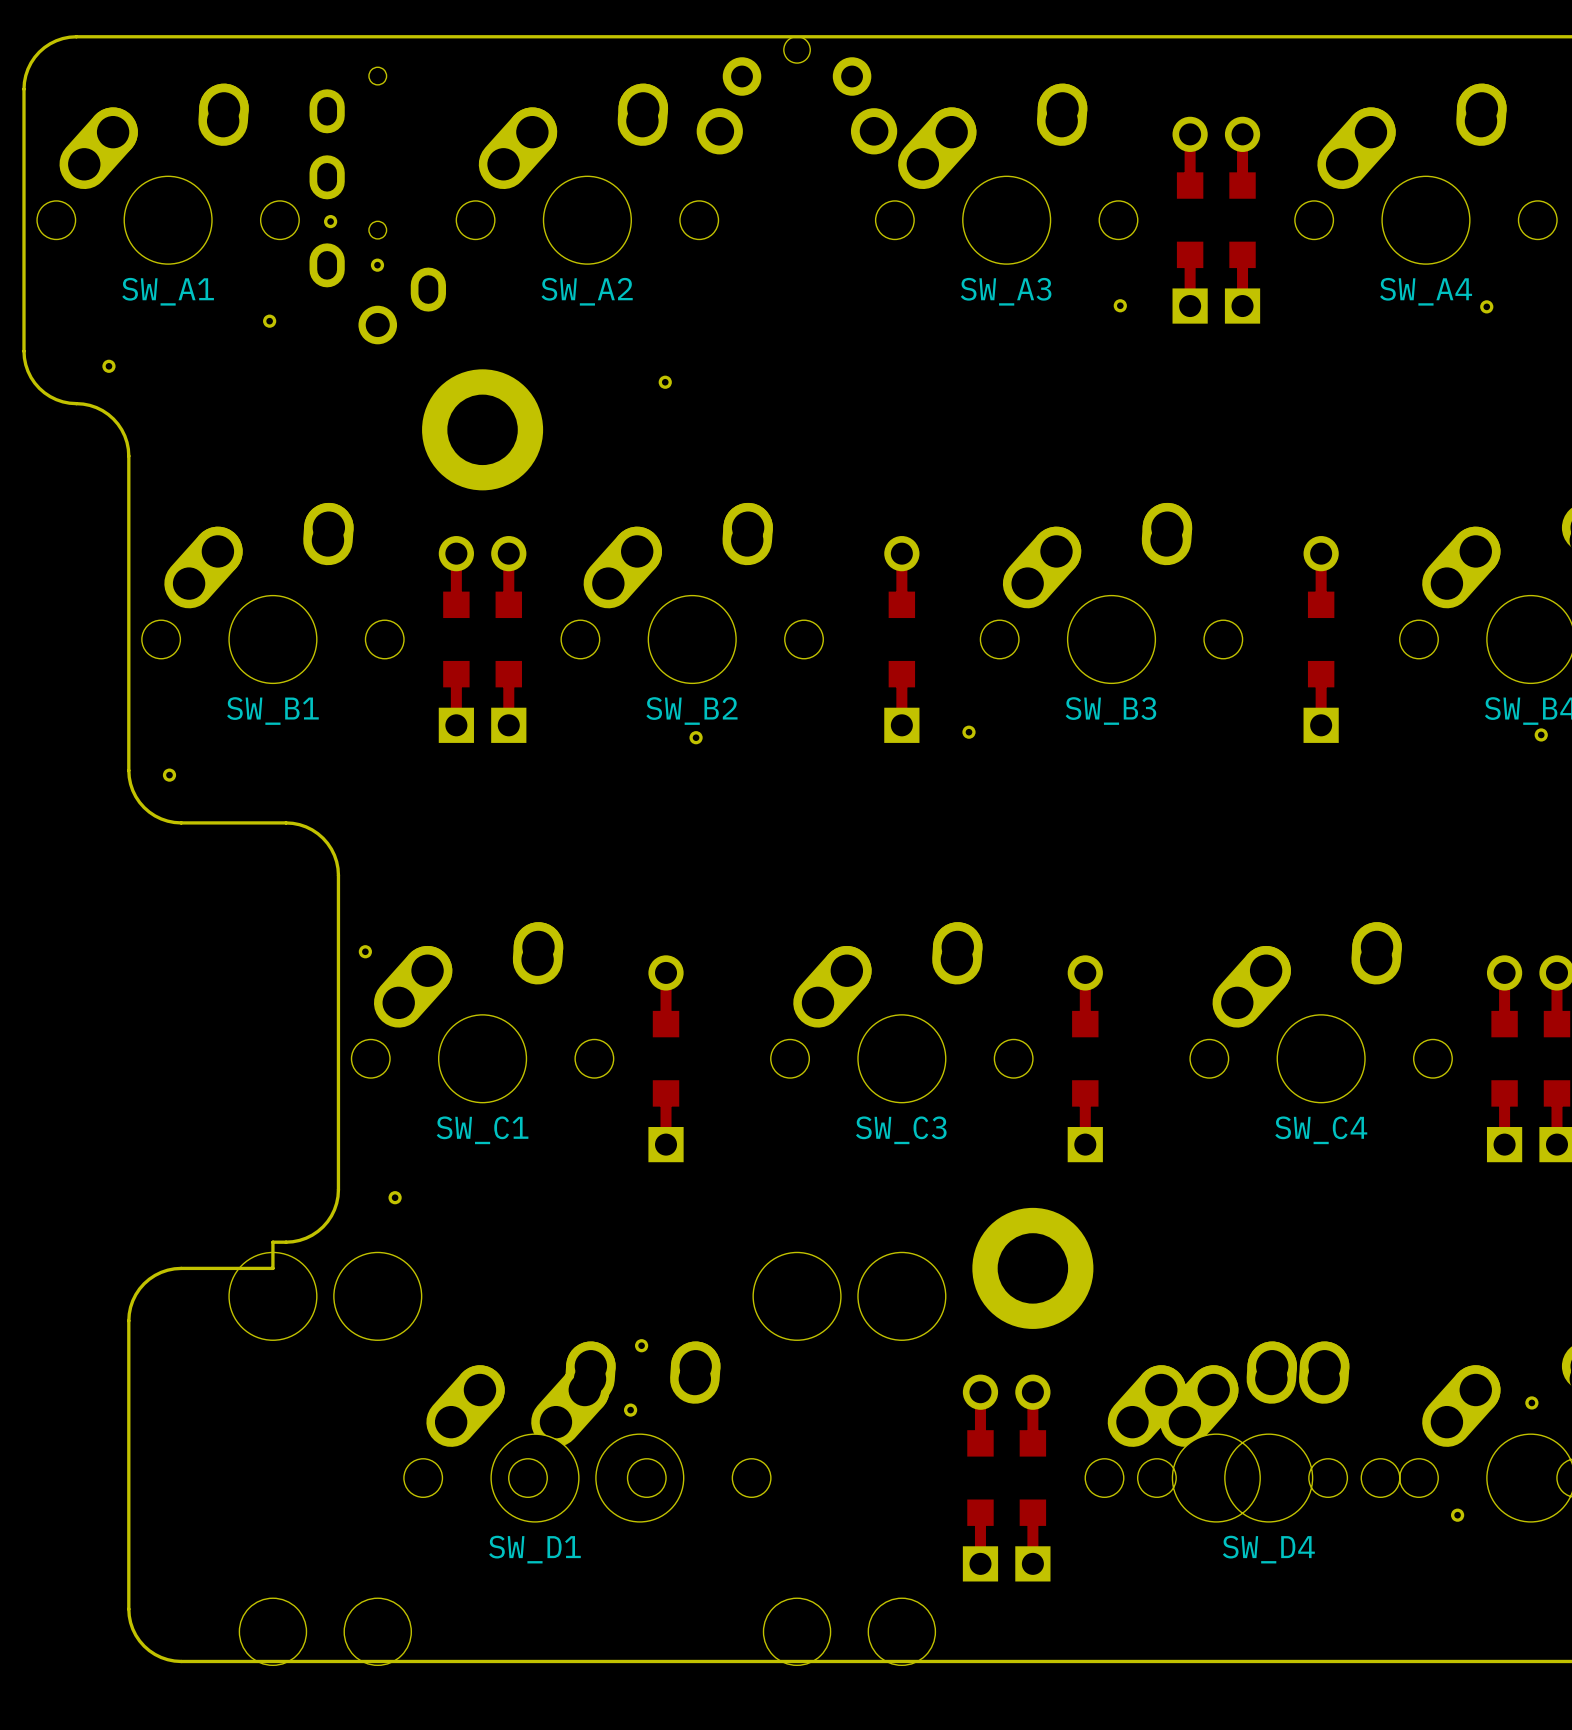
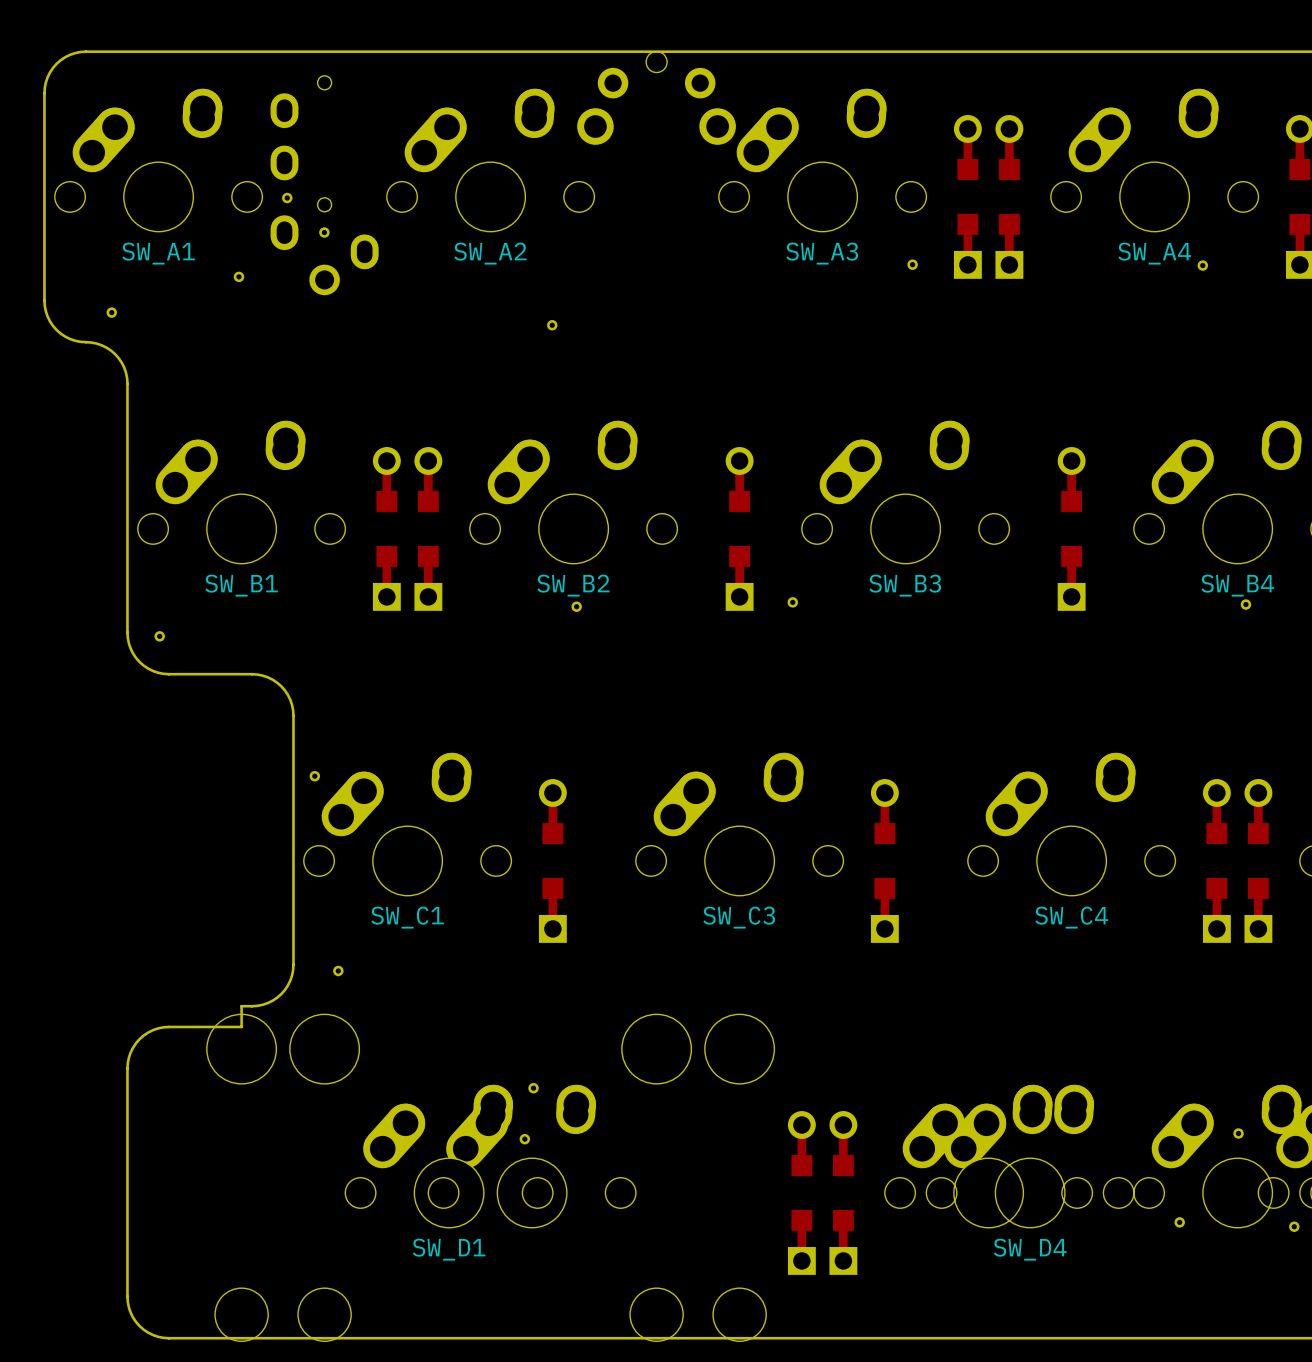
part: (482, 429) -> none
part: (1032, 1268) -> none

